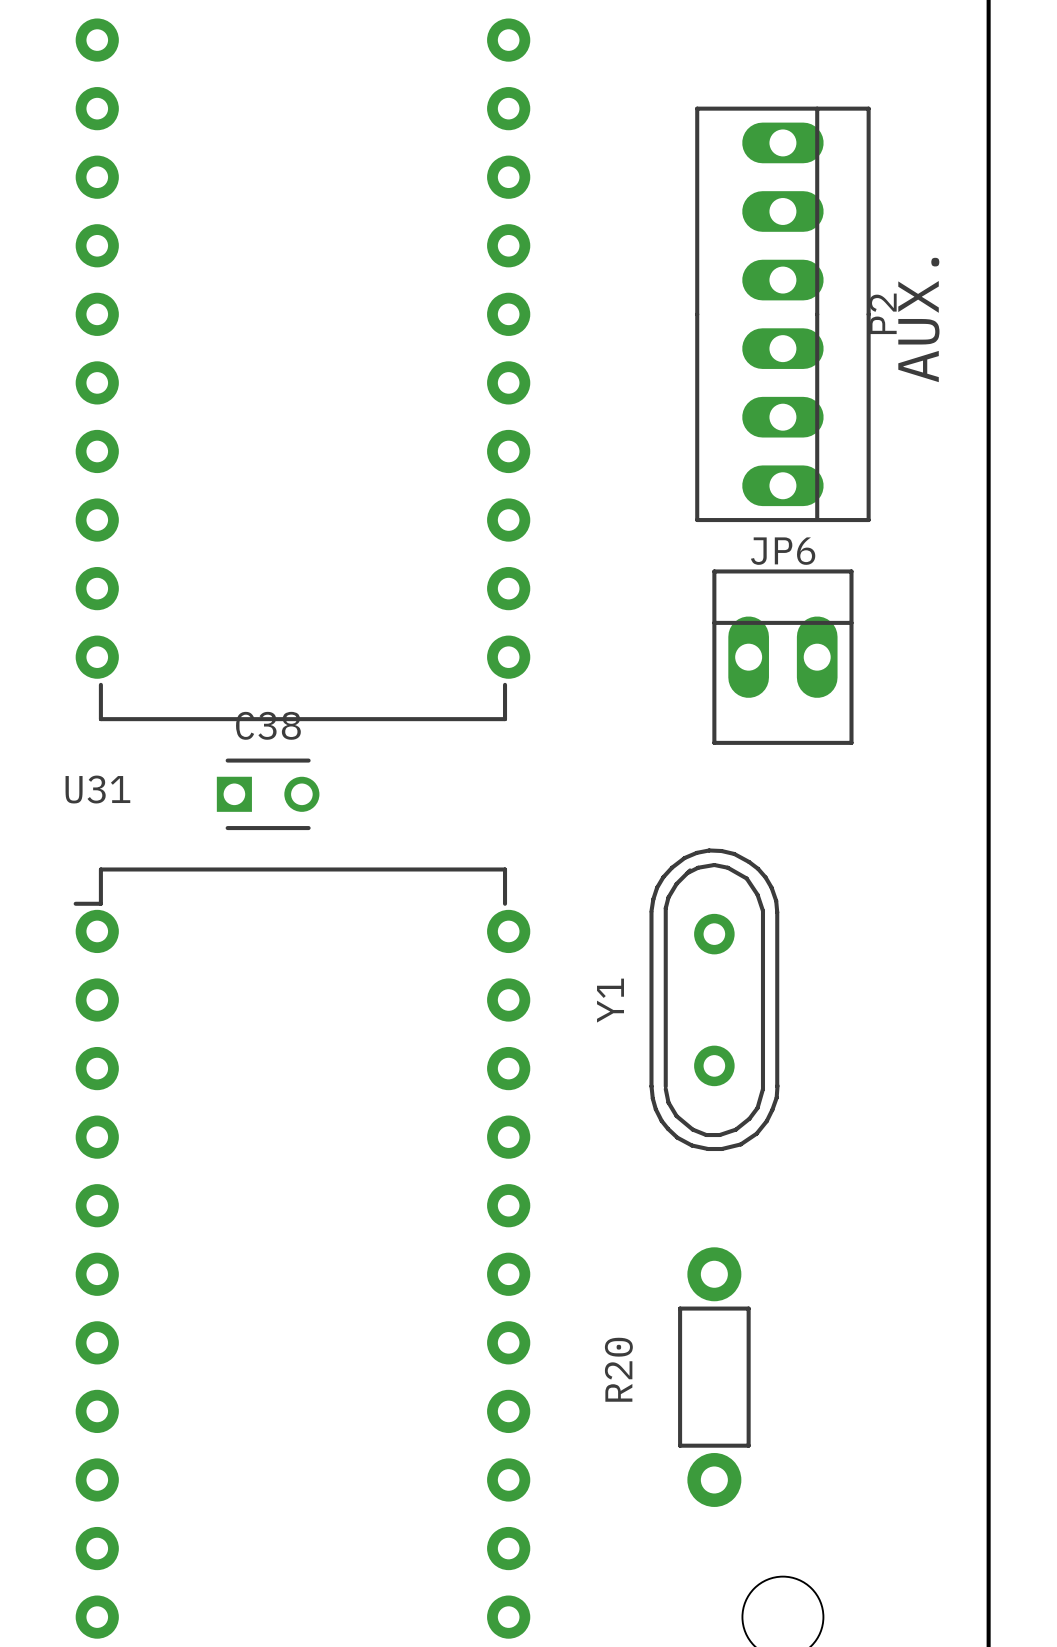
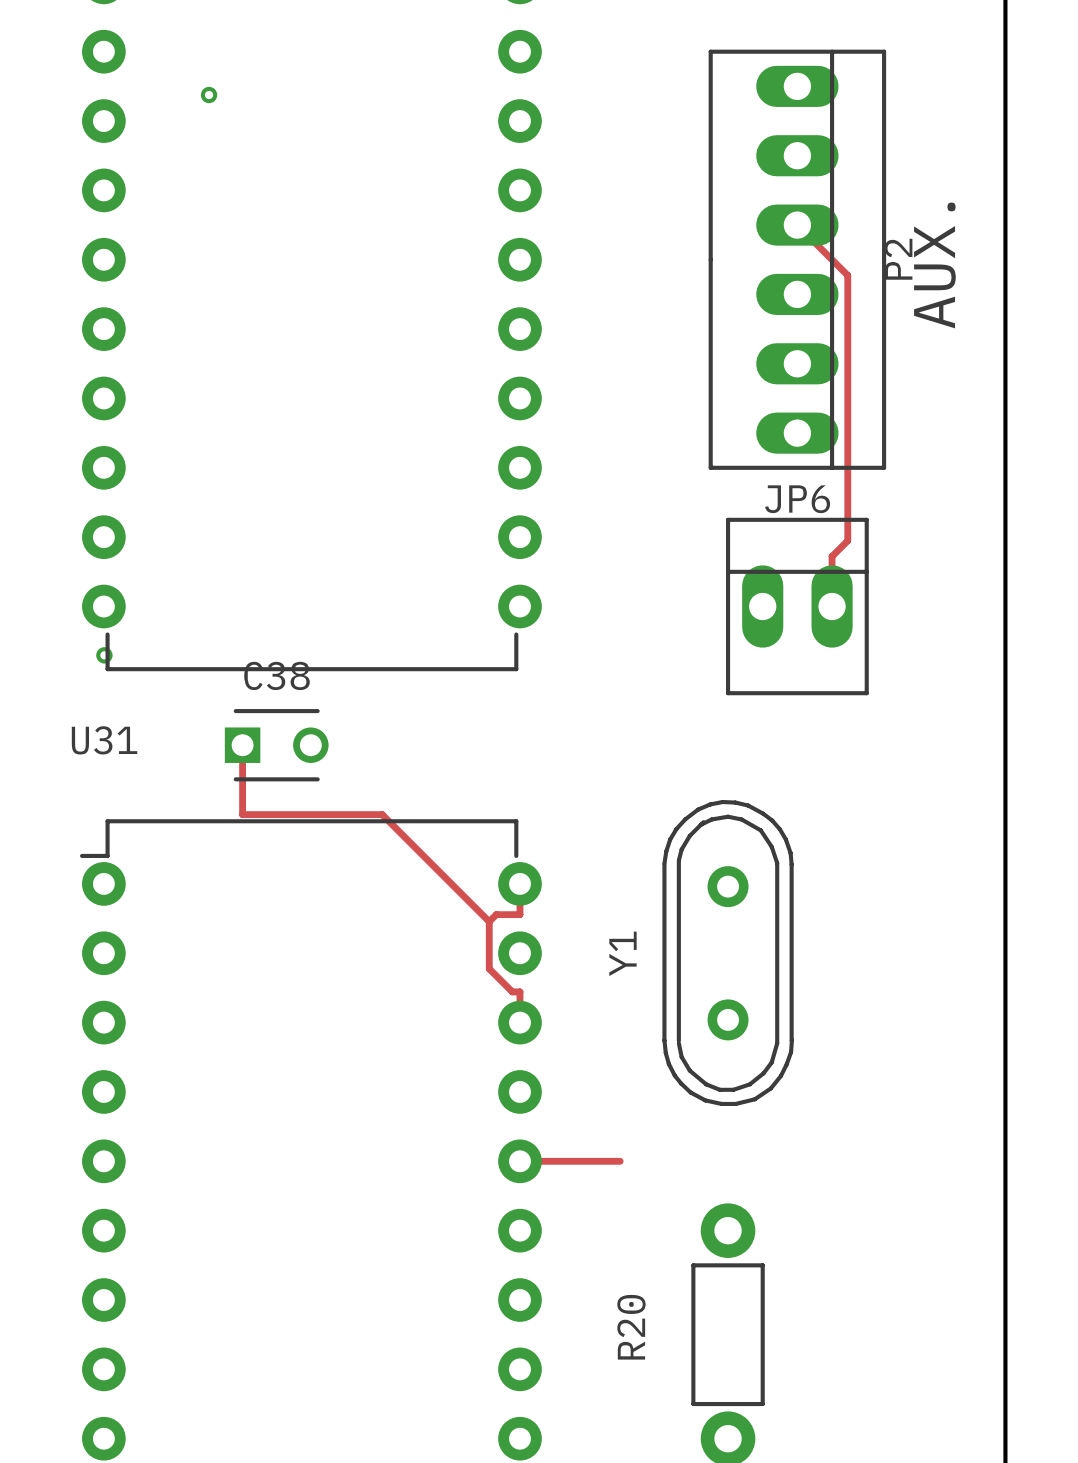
via: none -> (209, 95)
track: none -> (797, 225) (847, 275) (847, 540) (832, 556) (832, 606)
via: none -> (104, 655)
track: none -> (242, 745) (242, 814) (382, 814) (489, 921)
track: none -> (519, 883) (519, 914) (496, 914) (489, 921)
track: none -> (489, 921) (489, 968) (512, 991) (519, 991) (519, 1022)
track: none -> (519, 1161) (620, 1161)

